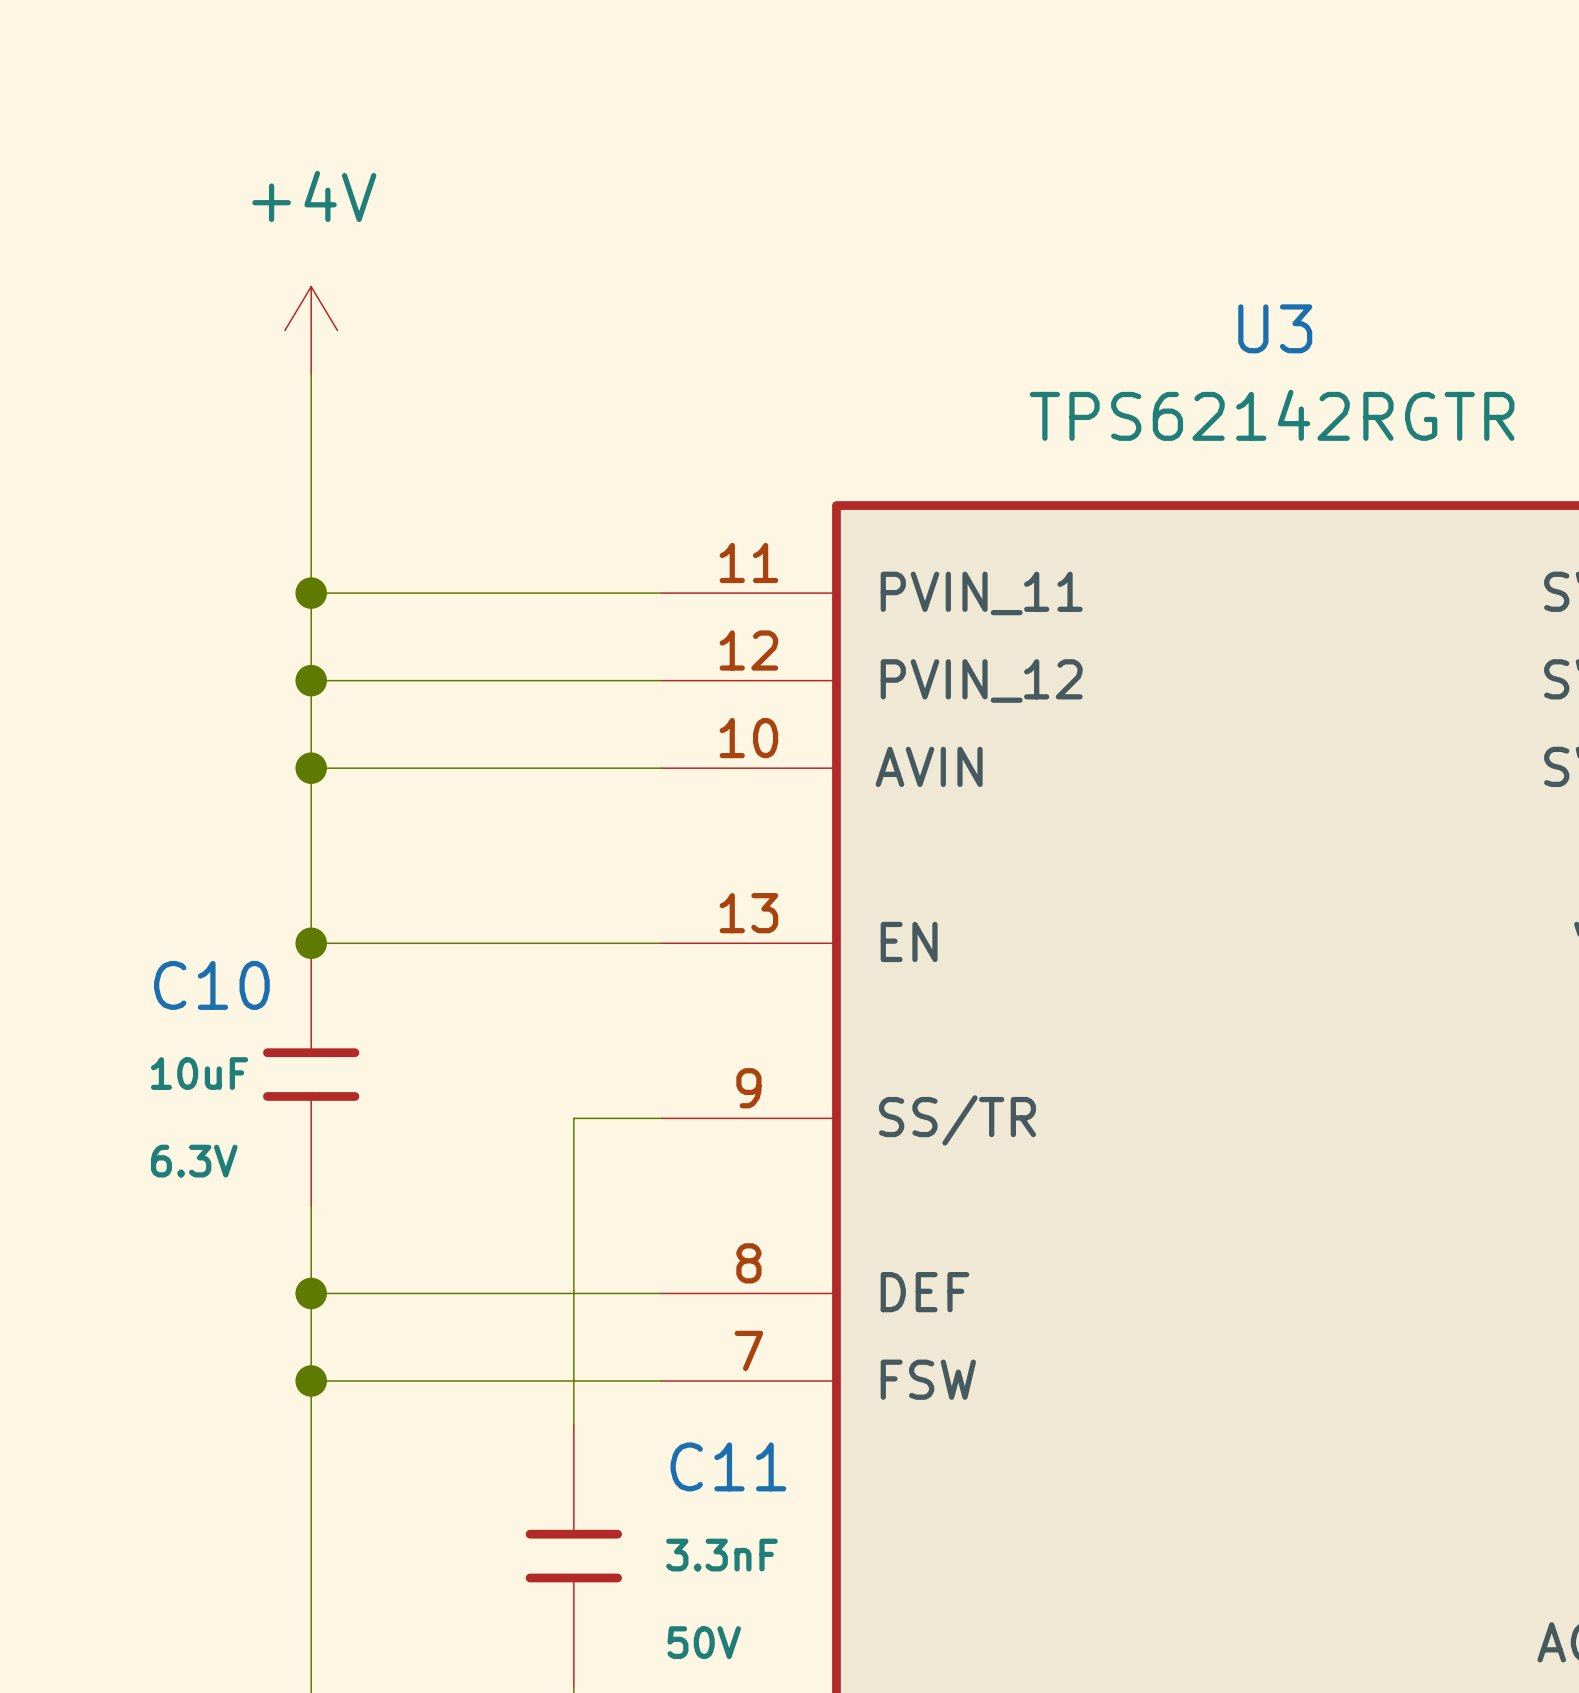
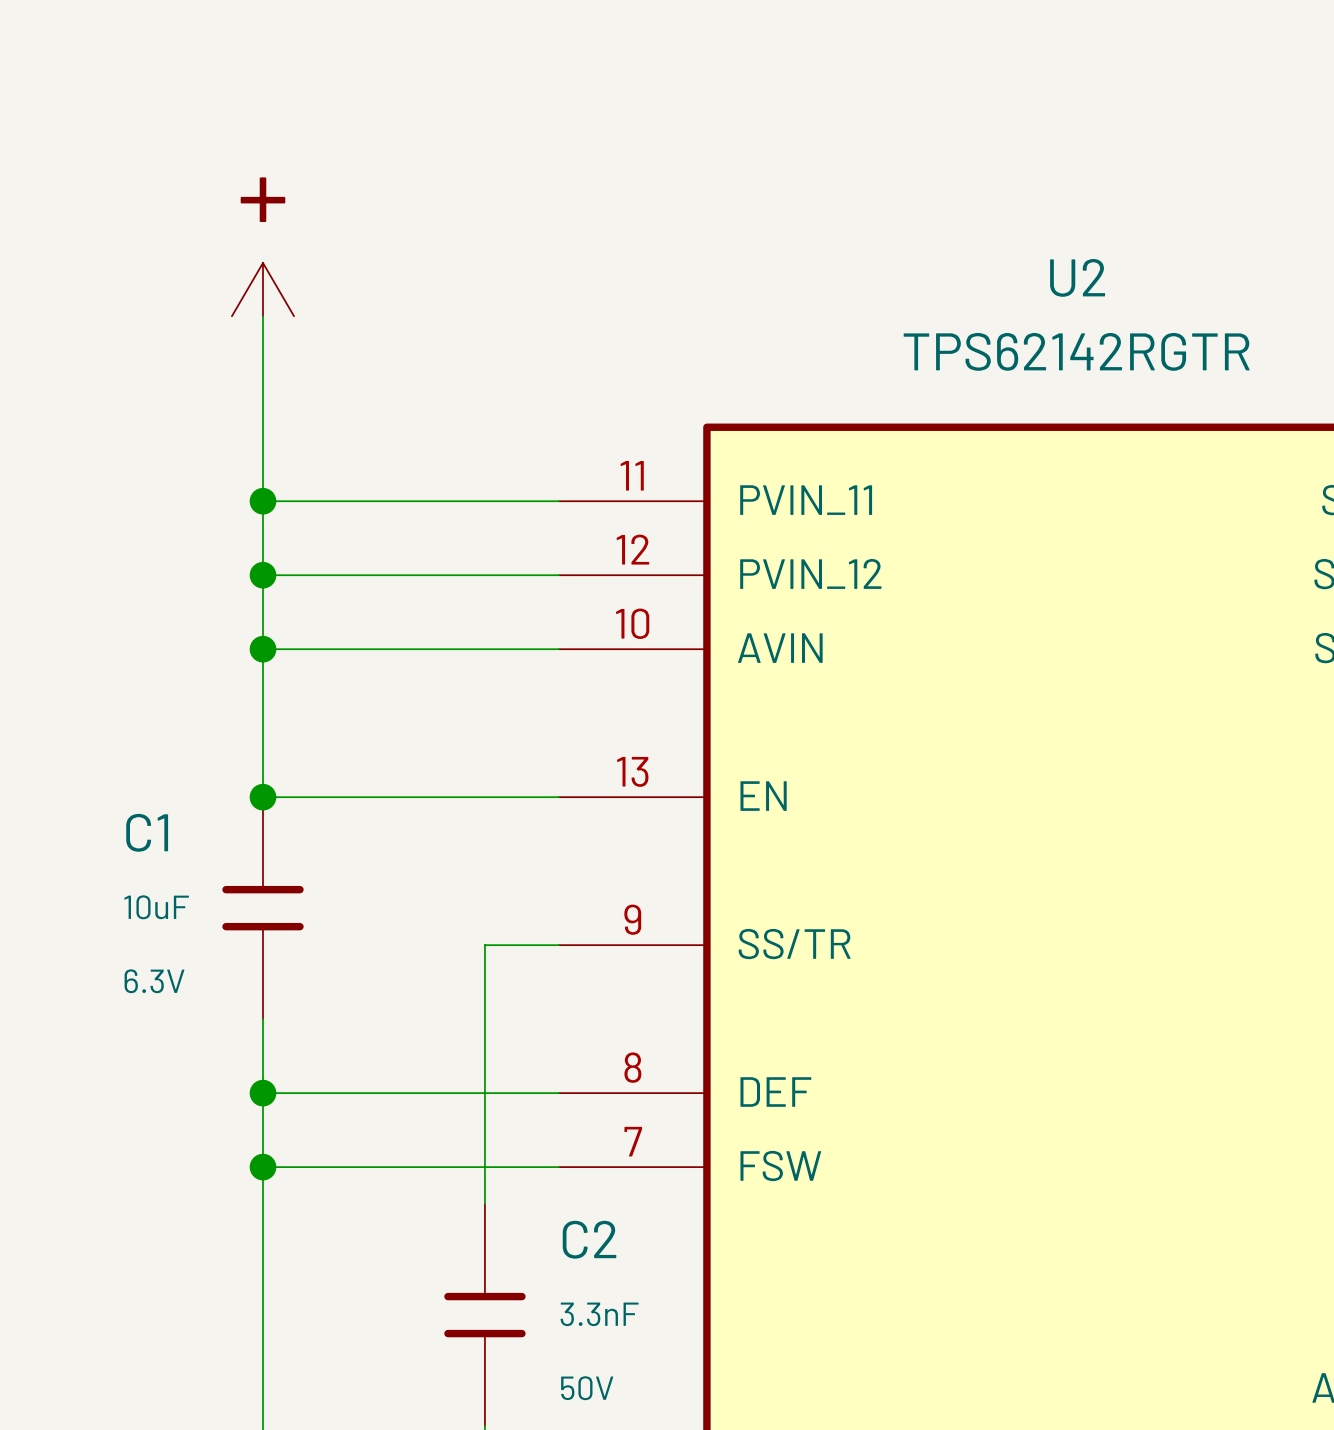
power symbol text: +4V (314, 196) -> none
power symbol shape: [284, 286, 338, 375] -> [231, 262, 295, 317]
U3 name: U3 (1275, 328) -> U2 (1077, 277)
C10 name: C10 (211, 985) -> C1 (147, 832)
C11 name: C11 (728, 1466) -> C2 (589, 1239)

